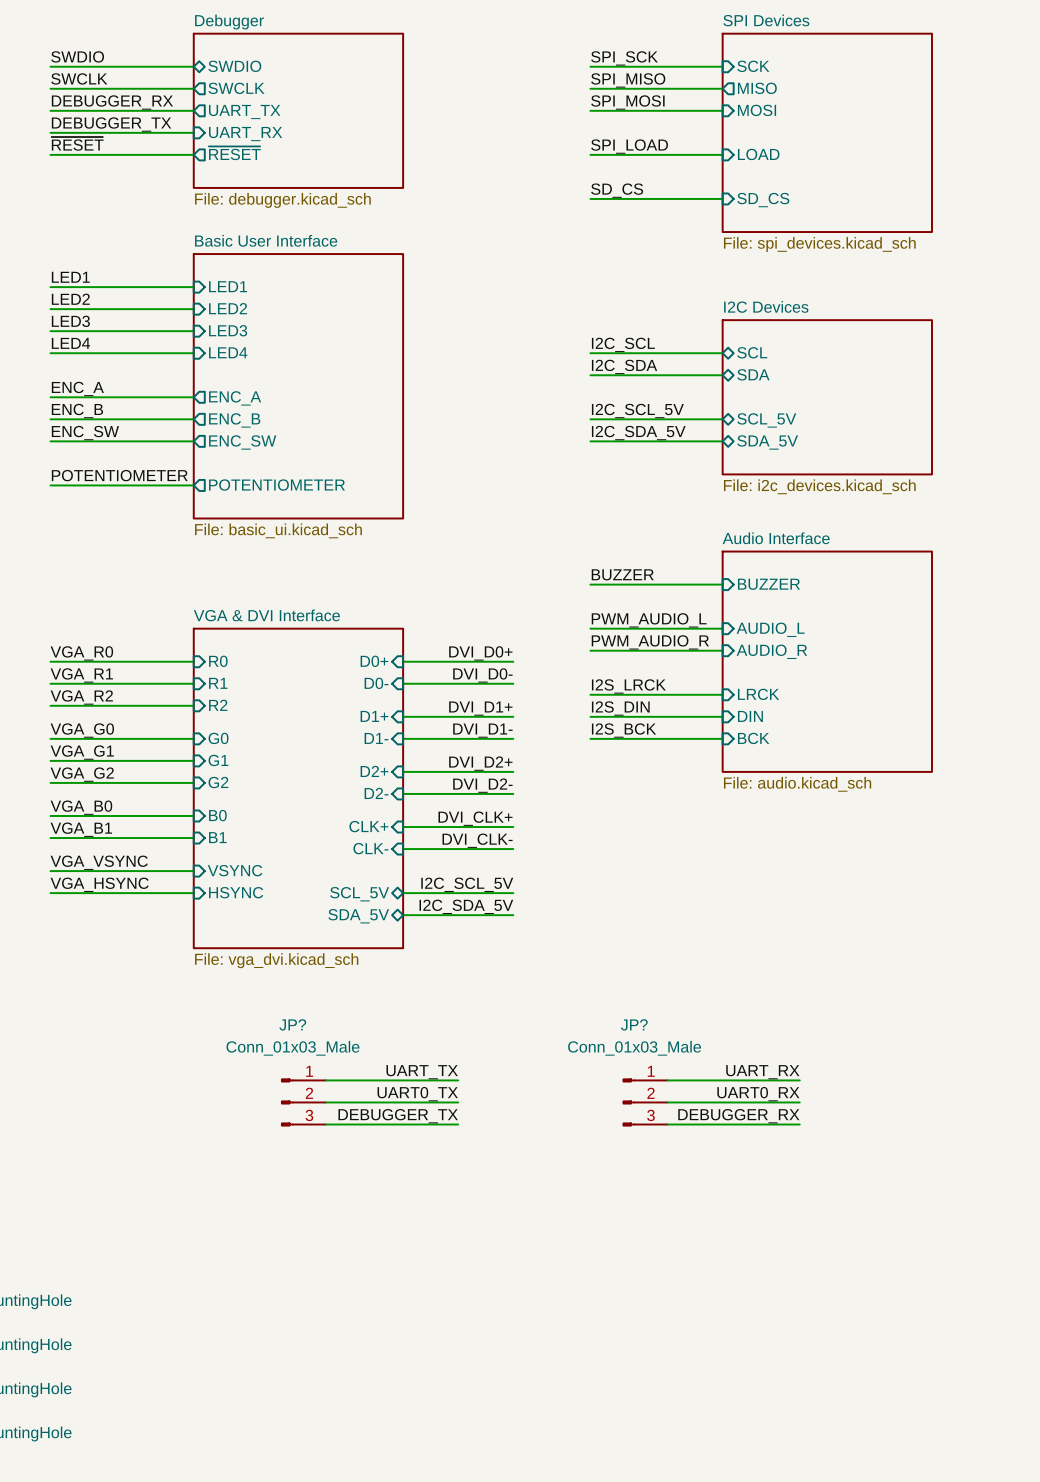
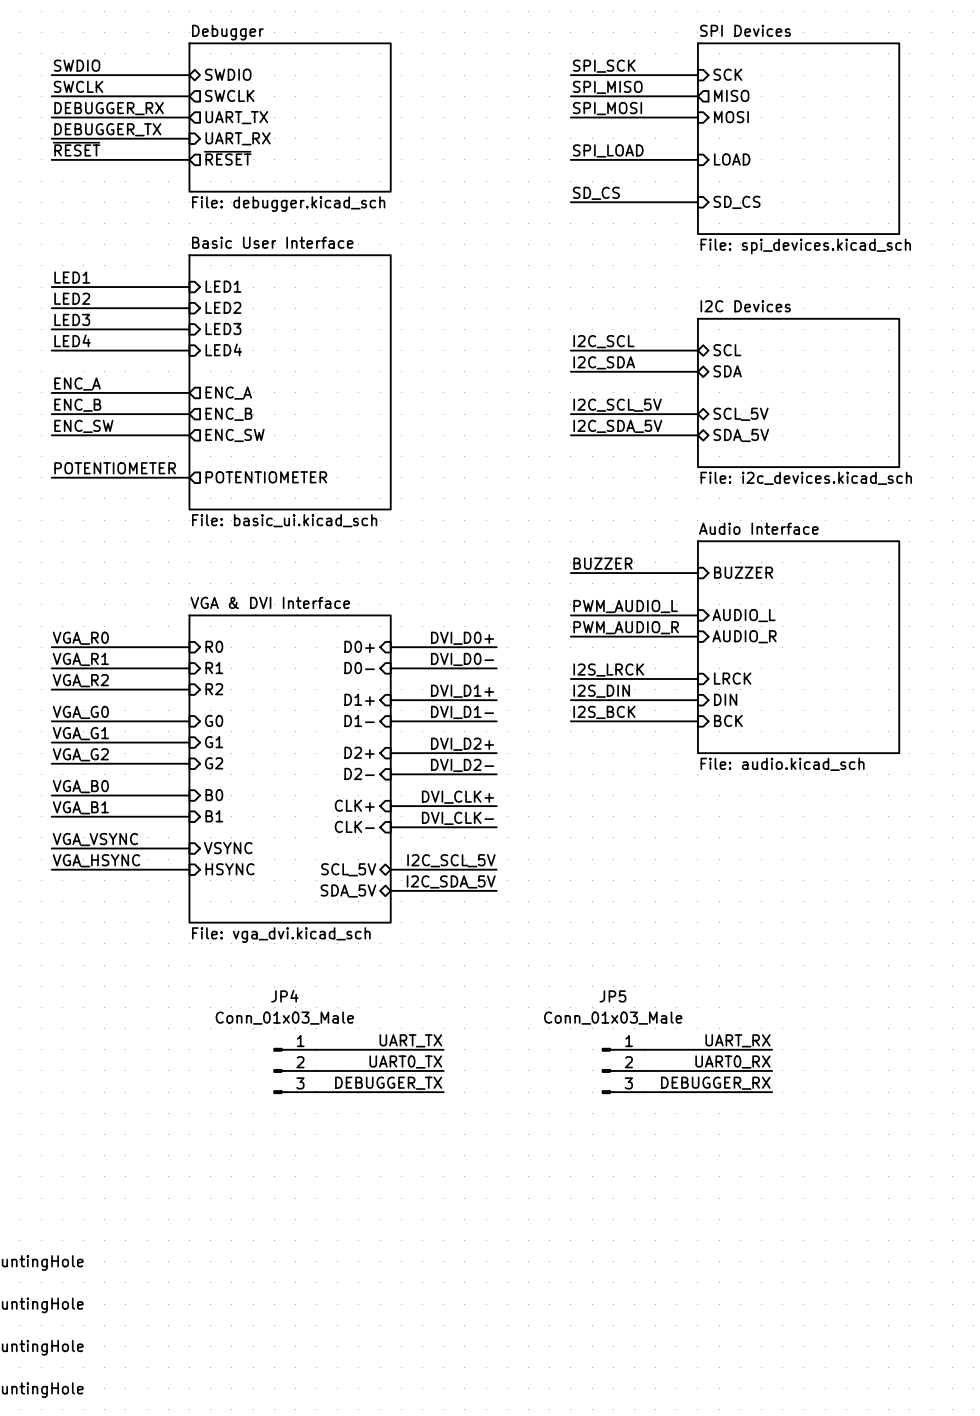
JP? name: JP? (292, 1024) -> JP4 (284, 996)
JP? name: JP? (634, 1024) -> JP5 (612, 996)

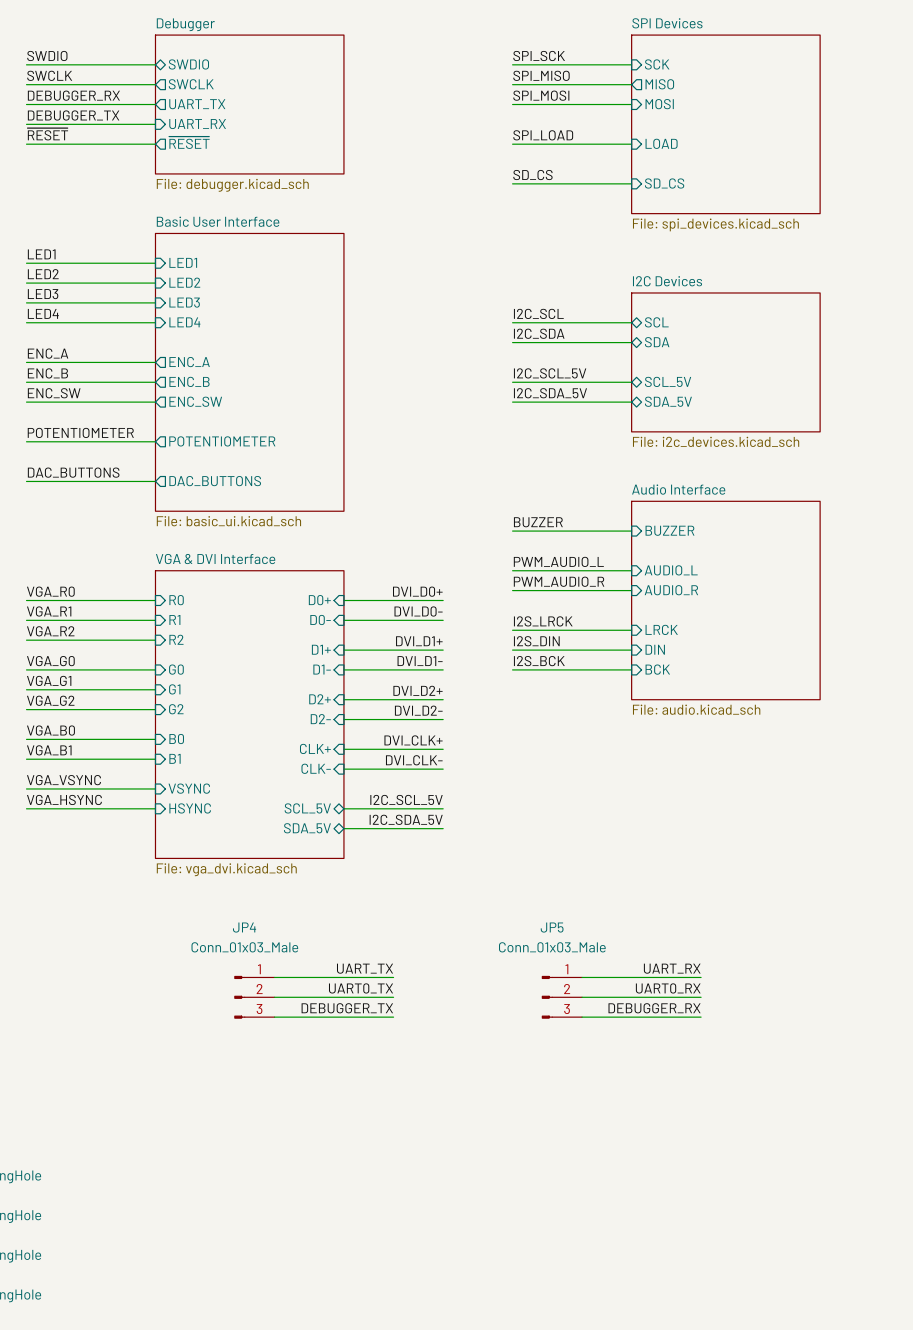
sheet Basic User Interface: File: basic_ui.kicad_sch (290, 382) -> none
sheet Basic User Interface: none -> File: basic_ui.kicad_sch (249, 372)
label: none -> DAC_BUTTONS (73, 472)
wire: none -> (26, 481) (155, 481)
sheet pin: none -> DAC_BUTTONS (215, 481)

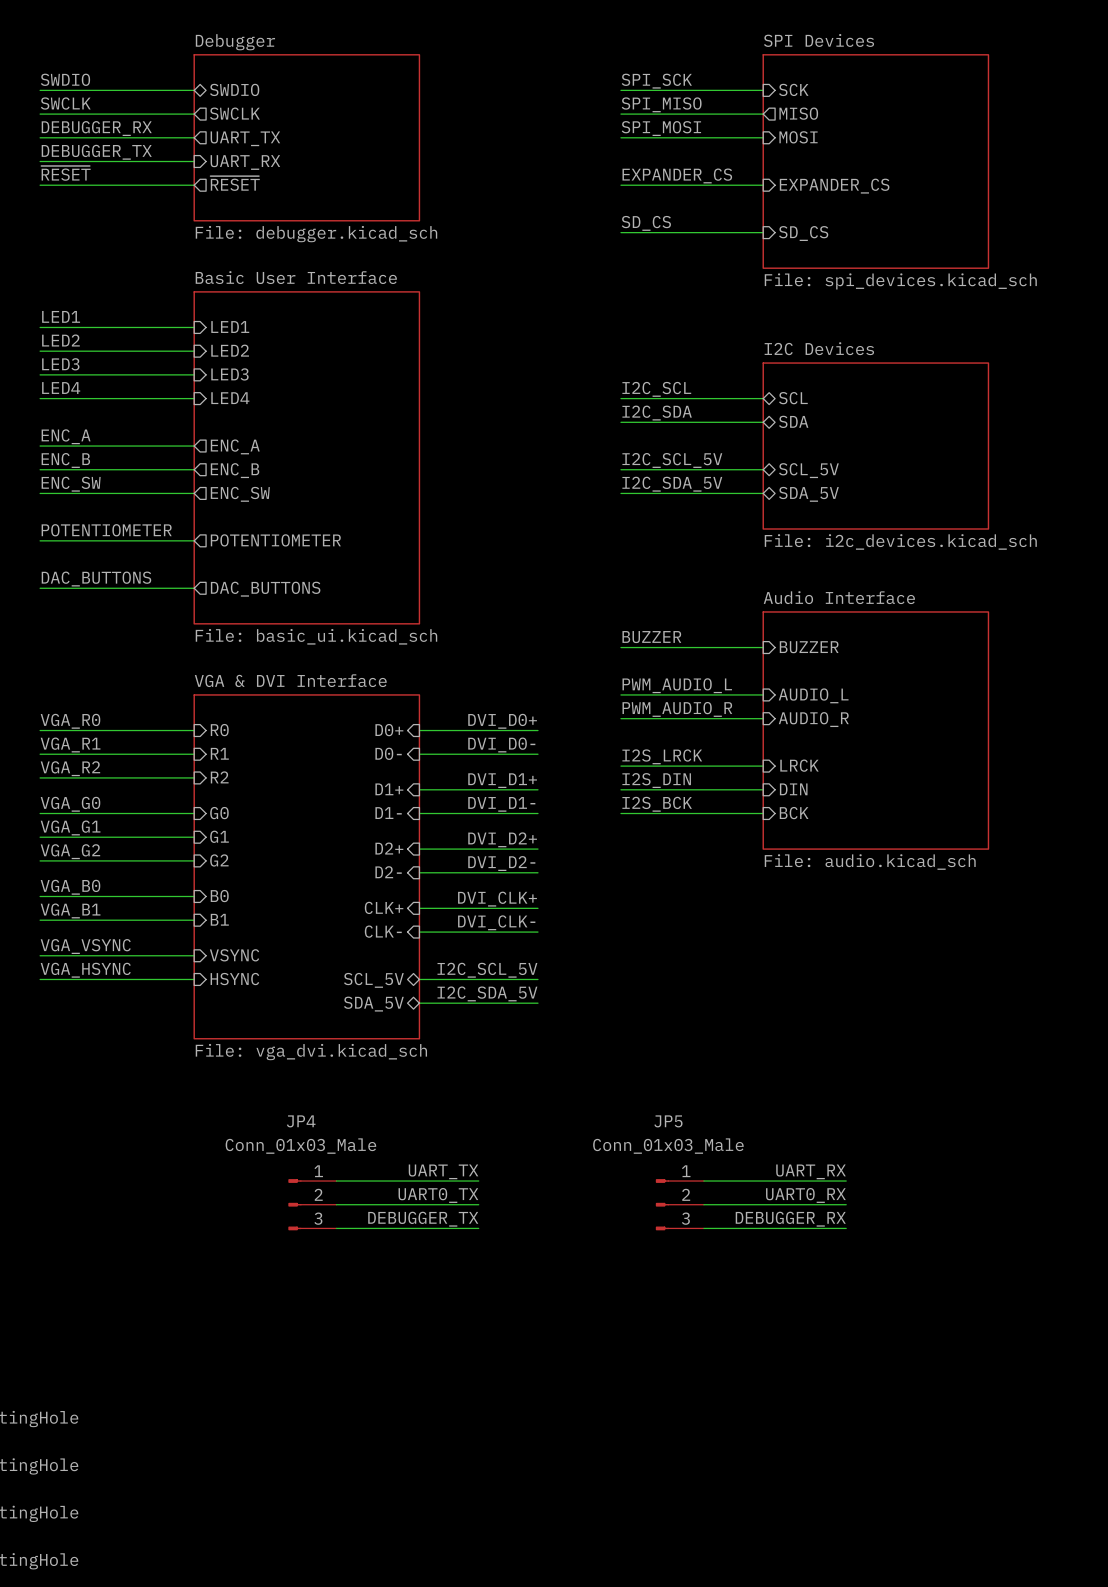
label: SPI_LOAD (543, 135) -> EXPANDER_CS (677, 175)
sheet pin: LOAD (661, 143) -> EXPANDER_CS (834, 186)

